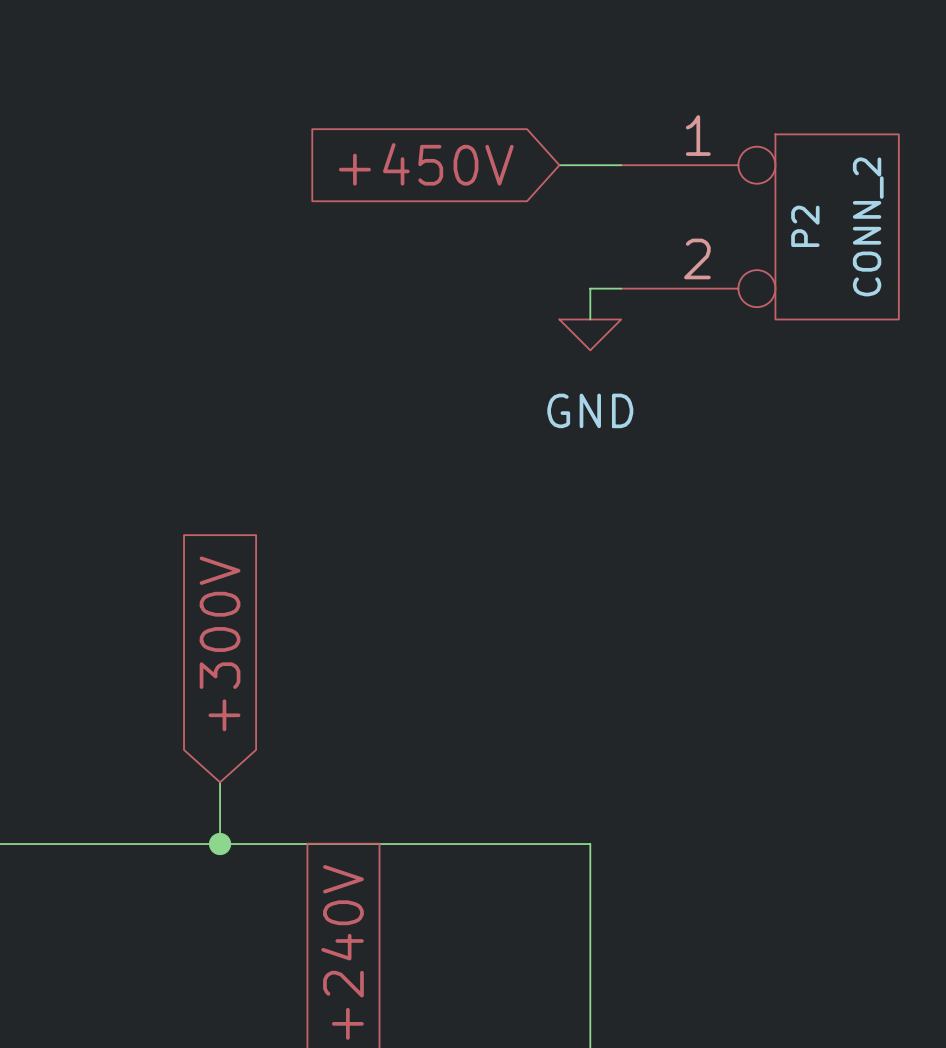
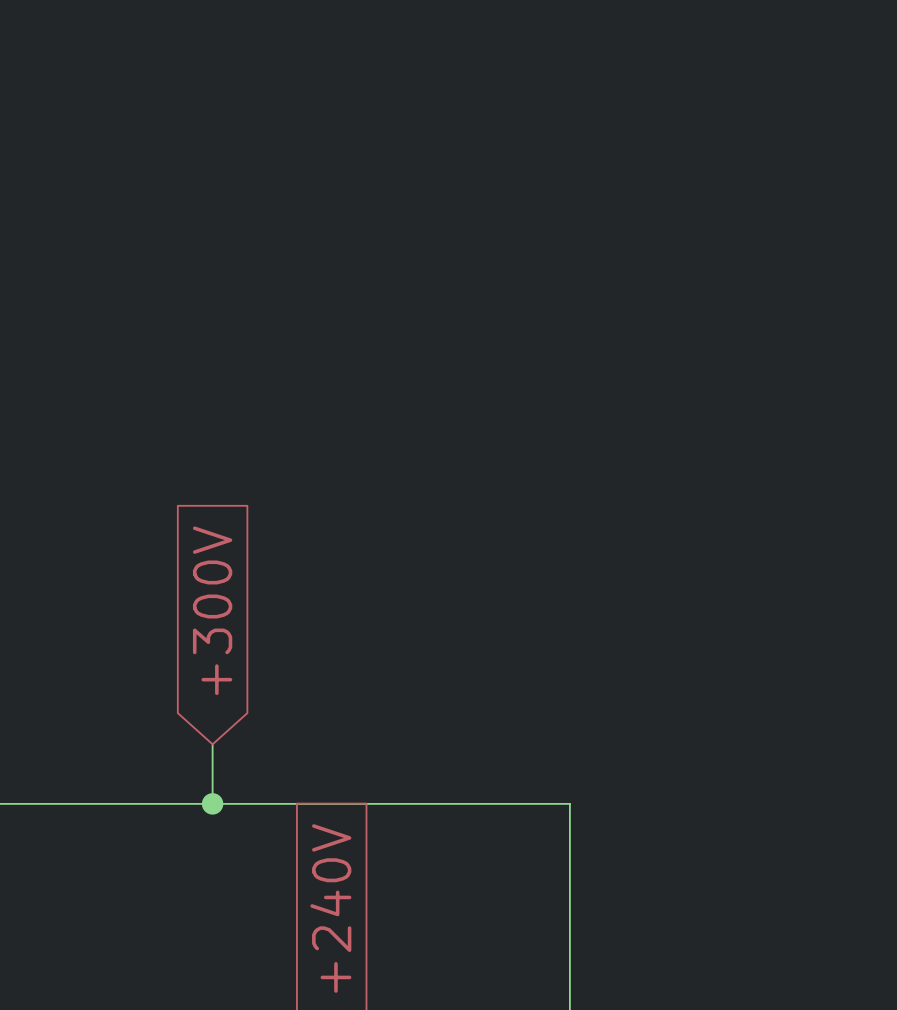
global label: +450V (426, 164) -> none
wire: (559, 165) (621, 165) -> none
P2: CONN_2 (760, 226) -> none
wire: (621, 288) (590, 288) (590, 319) -> none
power symbol: GND (590, 334) -> none

